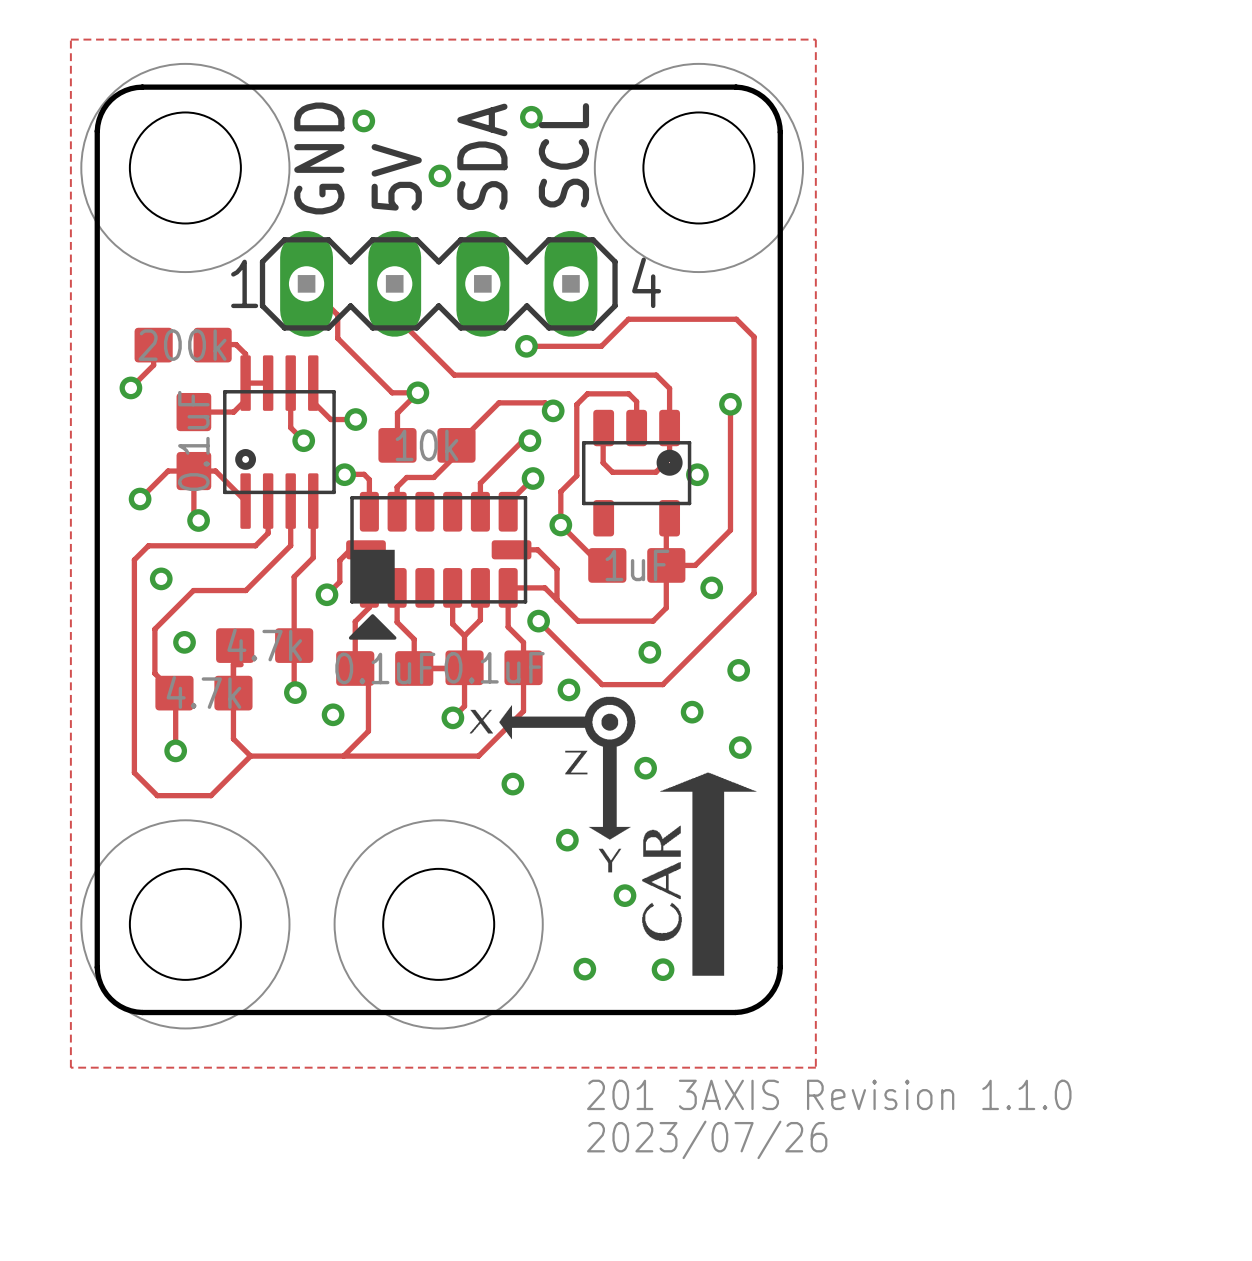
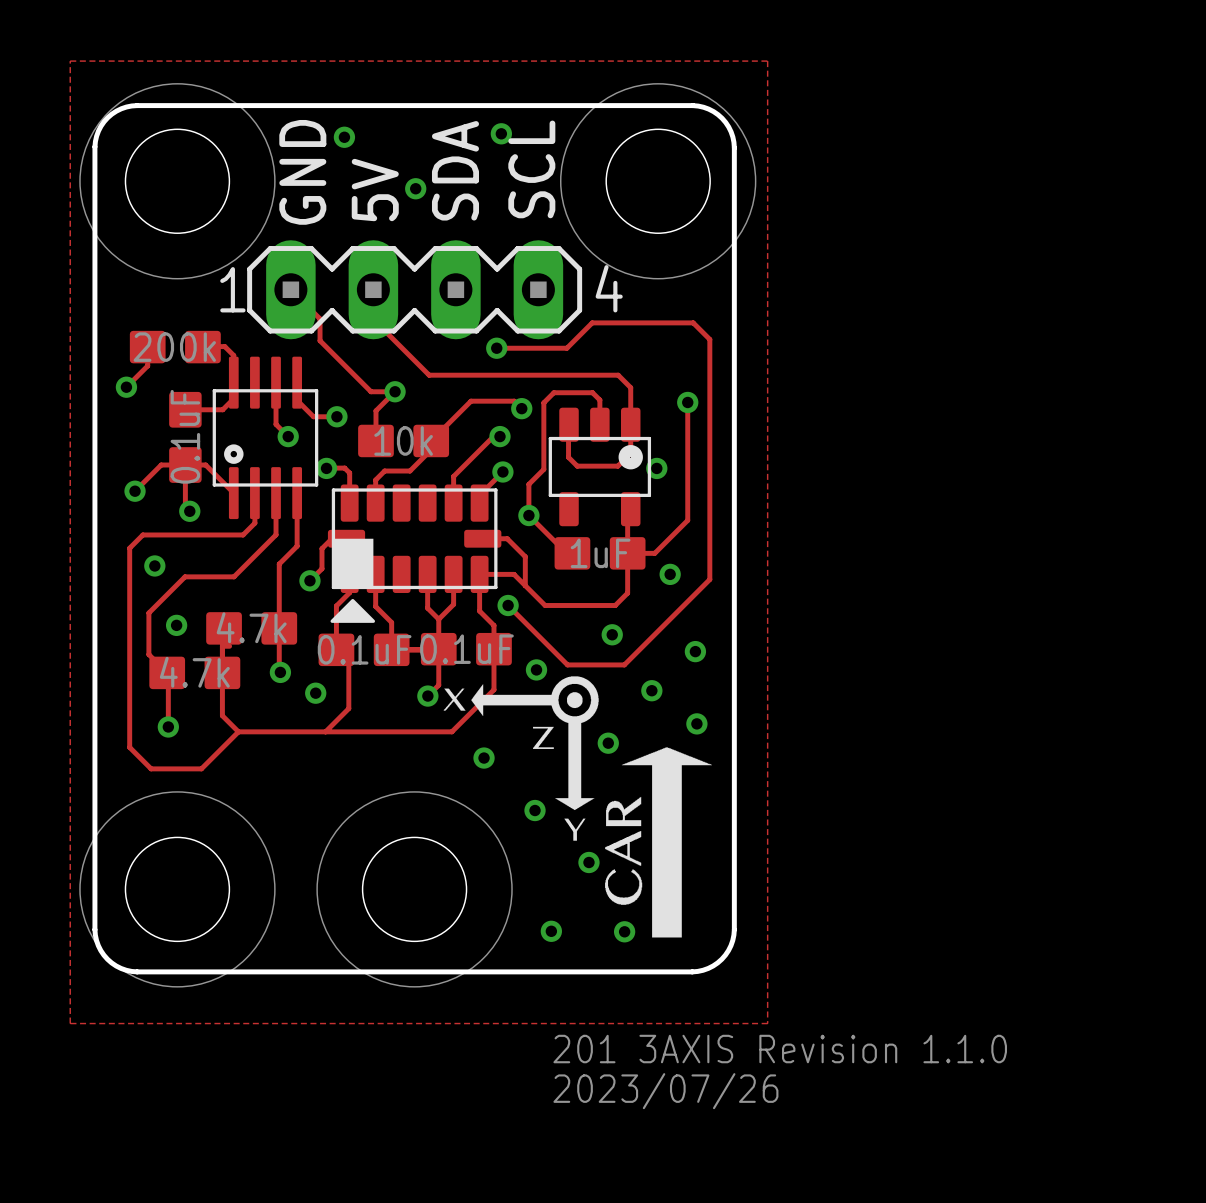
track: (245, 383) (268, 383) -> none

